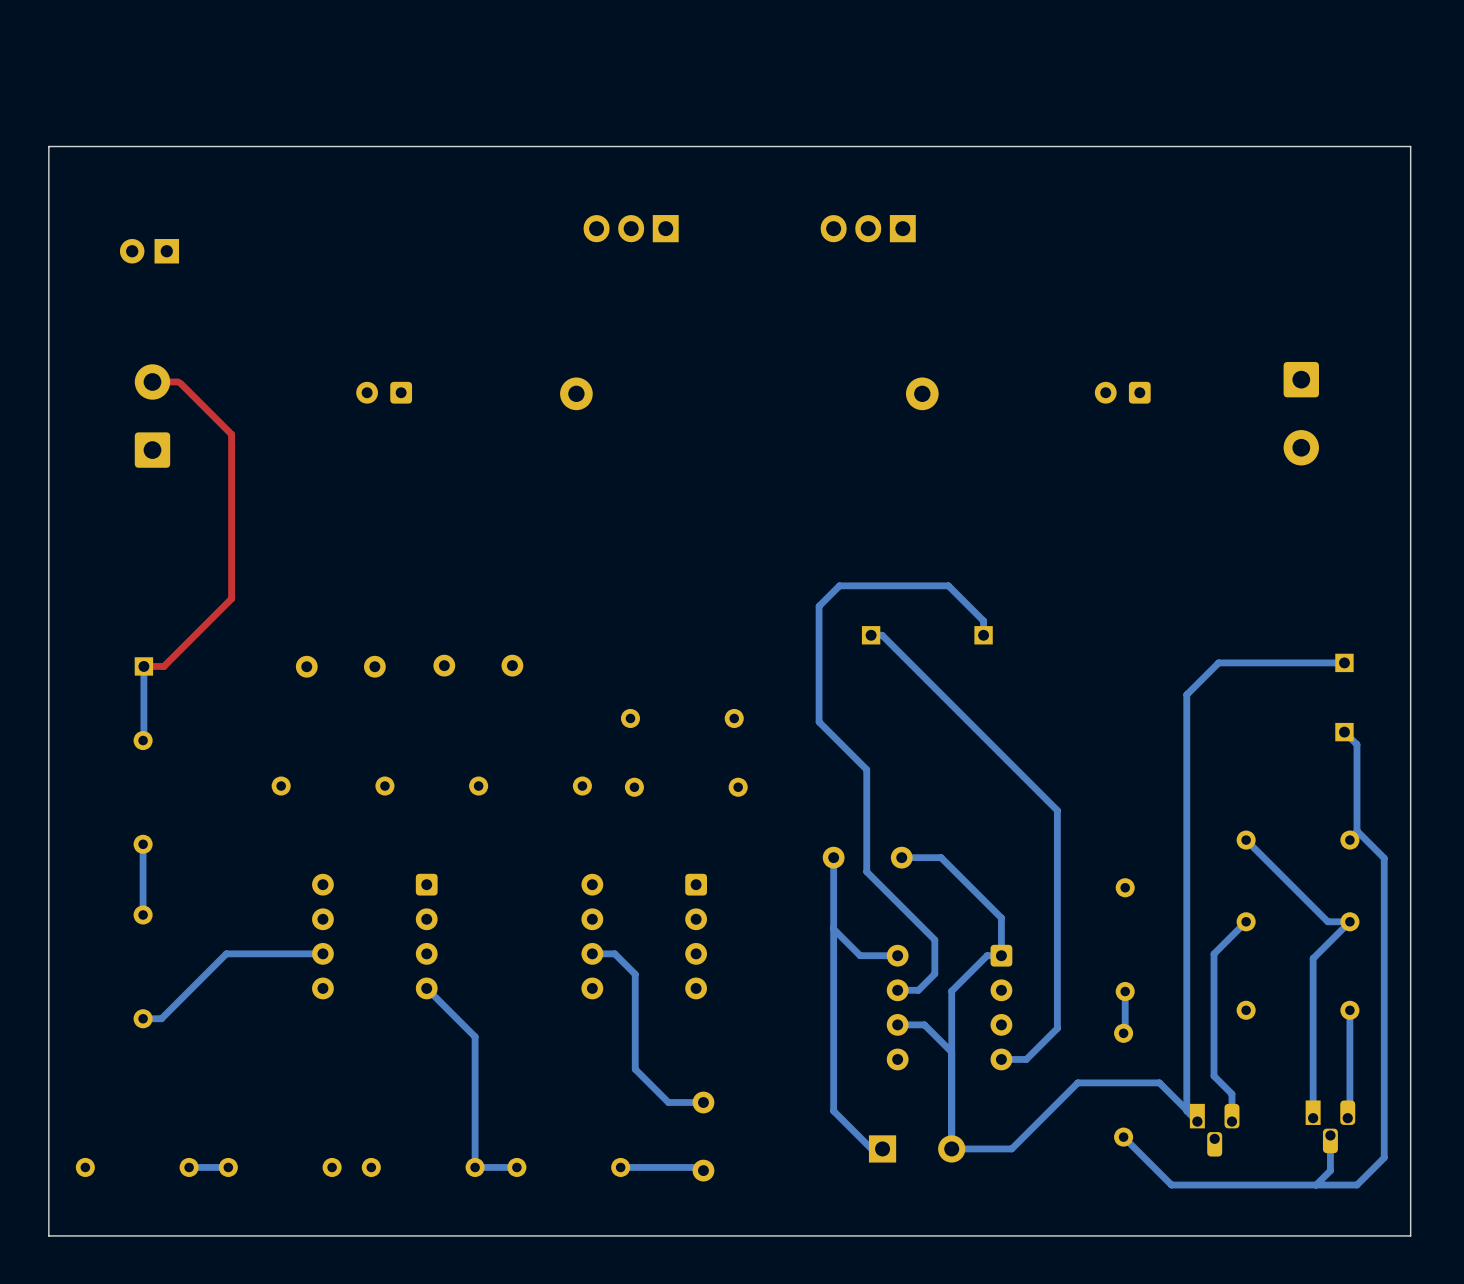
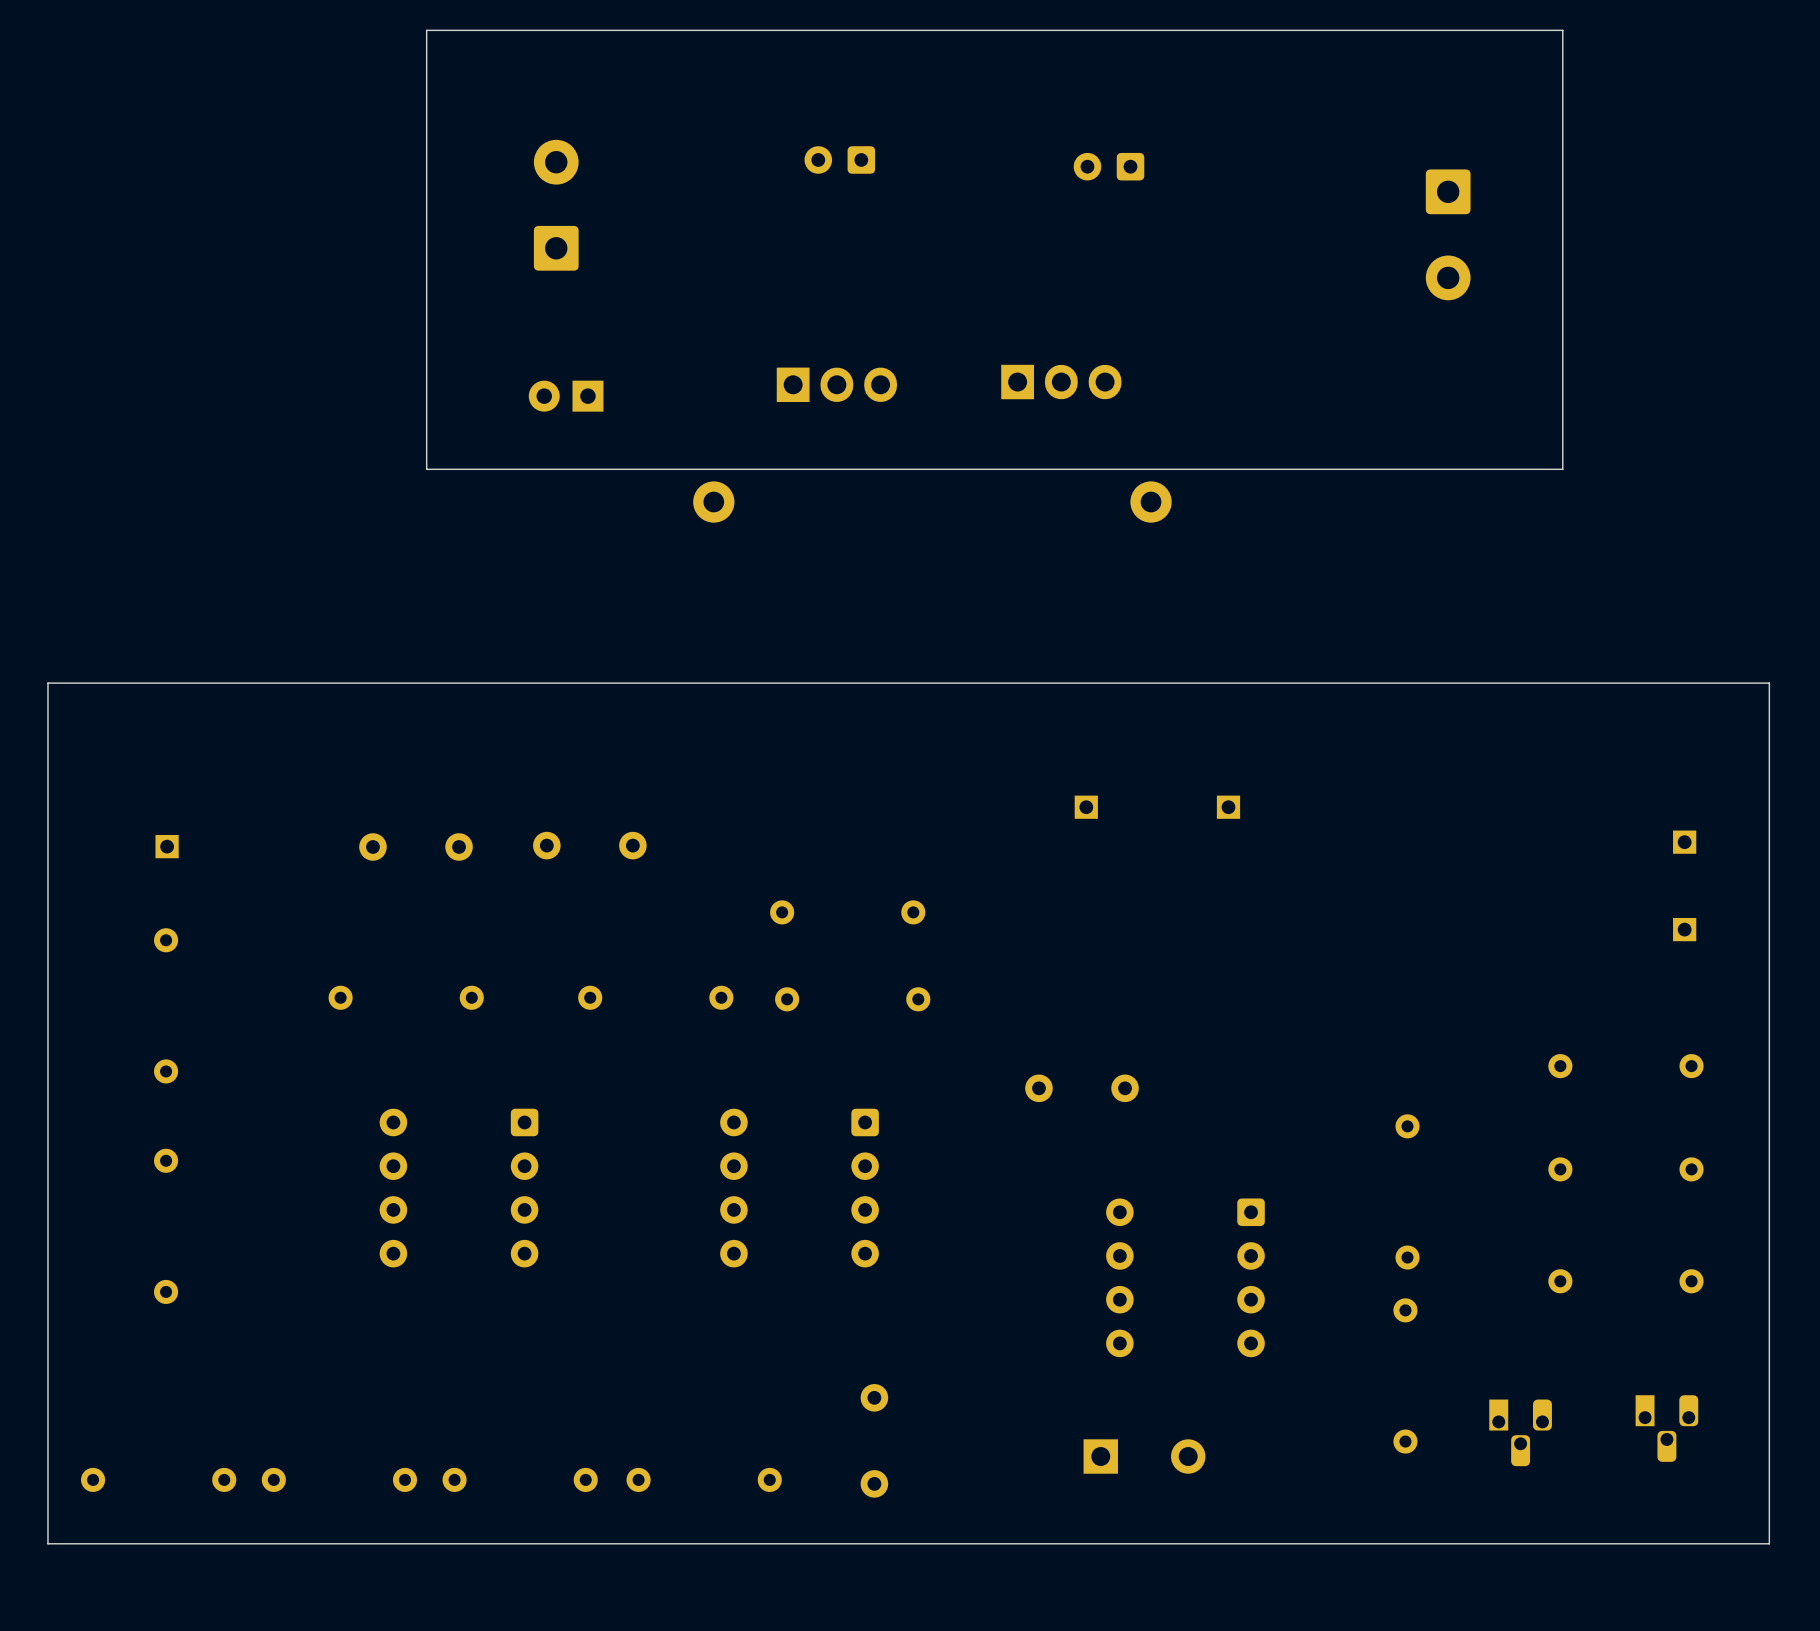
board edge: none -> (1562, 30) (426, 30) (426, 469) (1562, 469) (1562, 30)
part: none -> (839, 159)
part: none -> (1108, 166)
board edge: (1410, 146) (48, 146) (48, 1235) (1410, 1235) (1410, 146) -> (1769, 683) (1769, 1543) (47, 1543) (47, 683) (1769, 683)
part: none -> (556, 205)
part rotation: 0° (631, 228) -> 180° (836, 384)
part position: (631, 228) -> (836, 384)
part rotation: 0° (868, 228) -> 180° (1061, 382)
part position: (868, 228) -> (1061, 382)
part position: (149, 251) -> (566, 396)
top track: (152, 381) (180, 383) (231, 434) (231, 598) (163, 666) (143, 666) -> none
part: (384, 392) -> none
part: (1122, 392) -> none
part position: (1301, 413) -> (1448, 234)
part: (152, 416) -> none
bottom track: (871, 635) (882, 635) (1057, 810) (1057, 1028) (1026, 1059) (1001, 1059) -> none
bottom track: (983, 635) (983, 620) (948, 585) (839, 585) (819, 606) (819, 722) (866, 769) (866, 871) (934, 939) (934, 973) (918, 990) (897, 990) -> none
bottom track: (1344, 662) (1218, 662) (1186, 694) (1186, 1110) (1197, 1121) (1197, 1120) (1159, 1082) (1077, 1082) (1011, 1148) (951, 1148) (951, 991) (987, 955) (1001, 955) (1001, 917) (941, 857) (901, 857) -> none
bottom track: (143, 666) (143, 740) -> none
bottom track: (1344, 732) (1356, 744) (1356, 833) (1349, 840) -> none
bottom track: (1356, 830) (1384, 858) (1384, 1157) (1356, 1185) (1171, 1185) (1123, 1137) -> none
bottom track: (1246, 840) (1327, 921) (1349, 921) (1313, 958) (1313, 1118) -> none
bottom track: (143, 844) (143, 914) -> none
bottom track: (833, 857) (833, 1111) (871, 1148) (882, 1148) -> none
bottom track: (1246, 921) (1214, 953) (1214, 1076) (1231, 1094) (1231, 1121) -> none
bottom track: (833, 929) (860, 955) (897, 955) -> none
bottom track: (322, 953) (226, 953) (161, 1018) (143, 1018) -> none
bottom track: (592, 953) (614, 953) (635, 974) (635, 1069) (668, 1102) (703, 1102) -> none
bottom track: (426, 988) (475, 1036) (475, 1167) (516, 1167) -> none
bottom track: (1125, 991) (1125, 1031) (1123, 1033) -> none
bottom track: (1349, 1010) (1349, 1115) (1347, 1118) -> none
bottom track: (897, 1024) (924, 1024) (951, 1052) -> none
bottom track: (1330, 1135) (1330, 1170) (1316, 1185) -> none
bottom track: (228, 1167) (189, 1167) -> none
bottom track: (620, 1167) (700, 1167) (703, 1170) -> none

